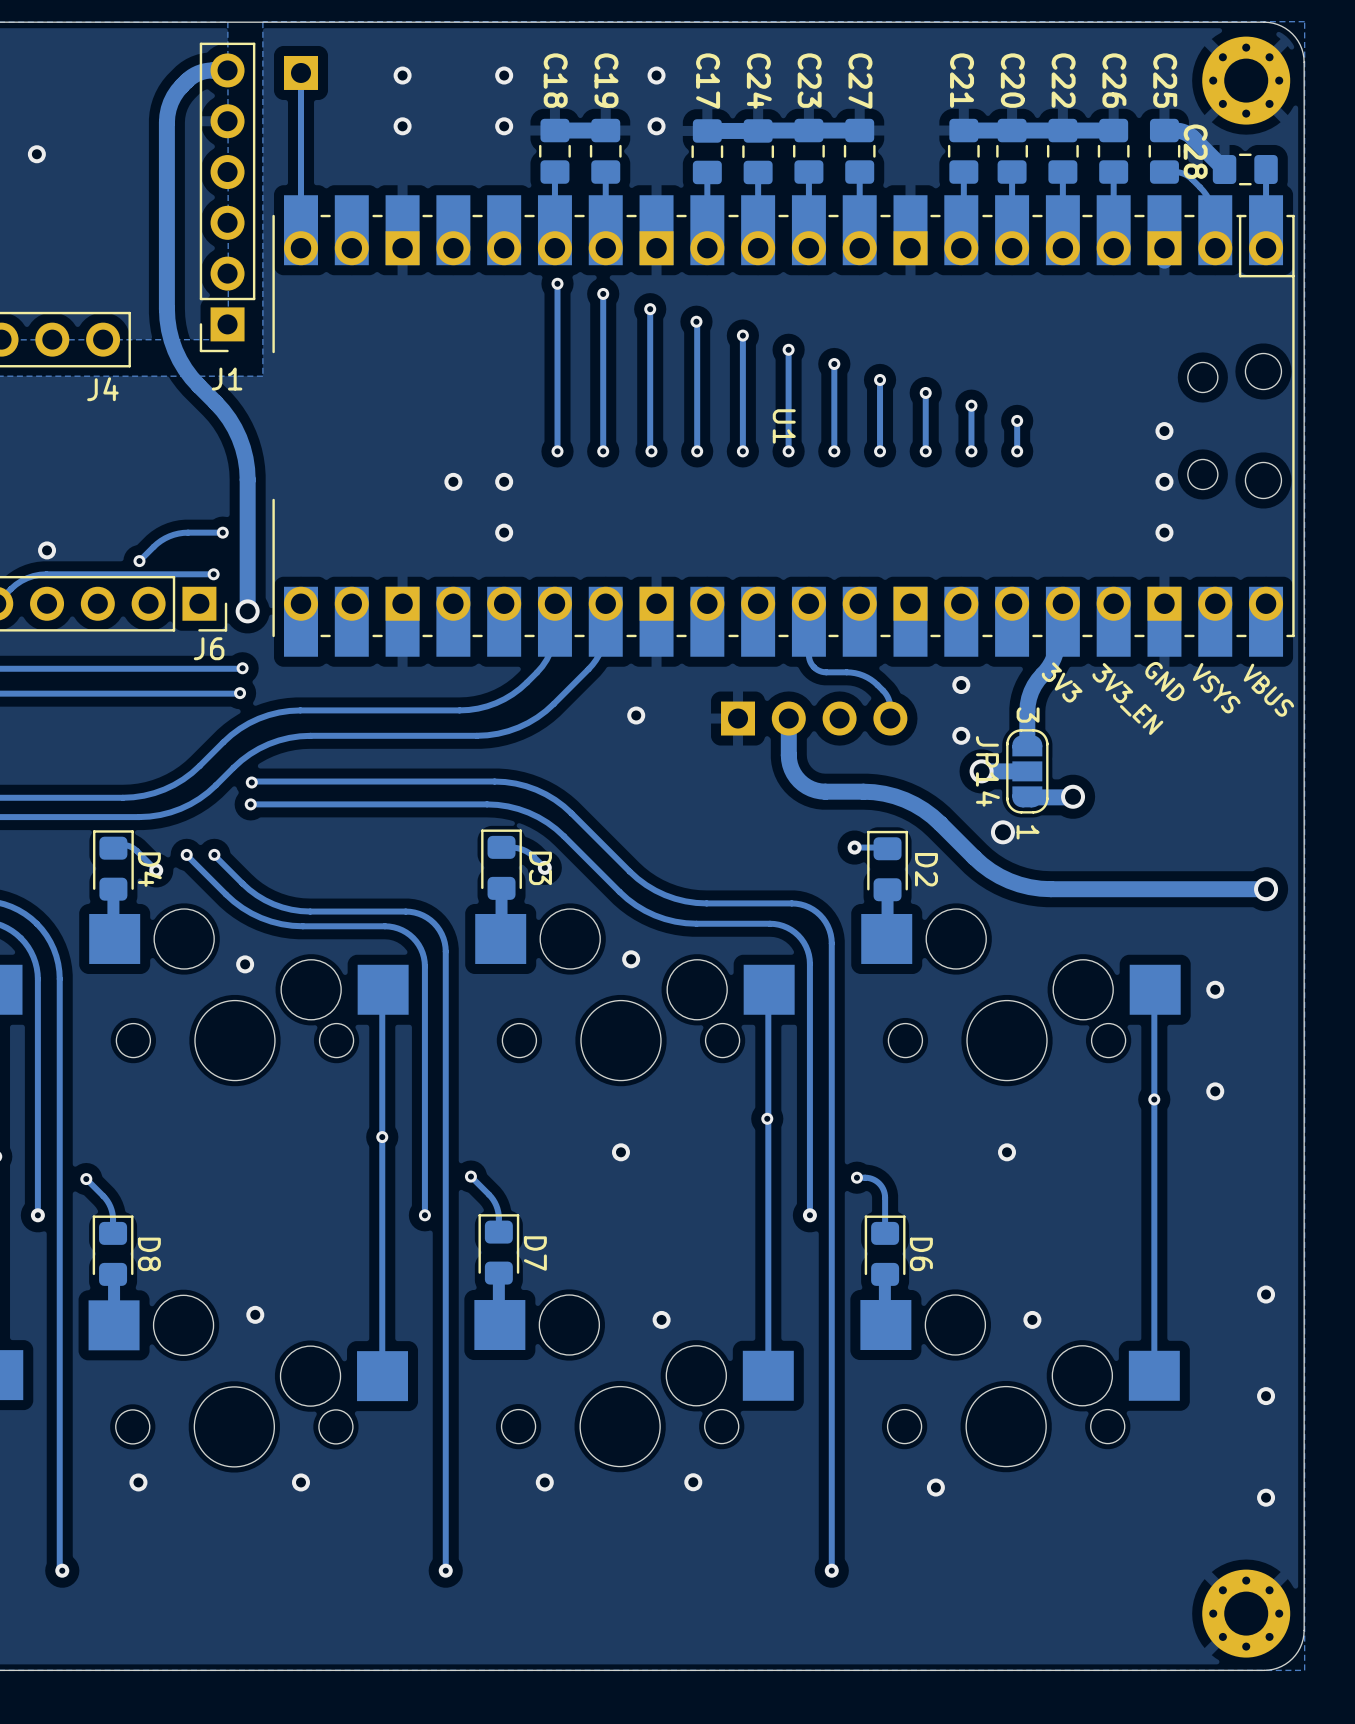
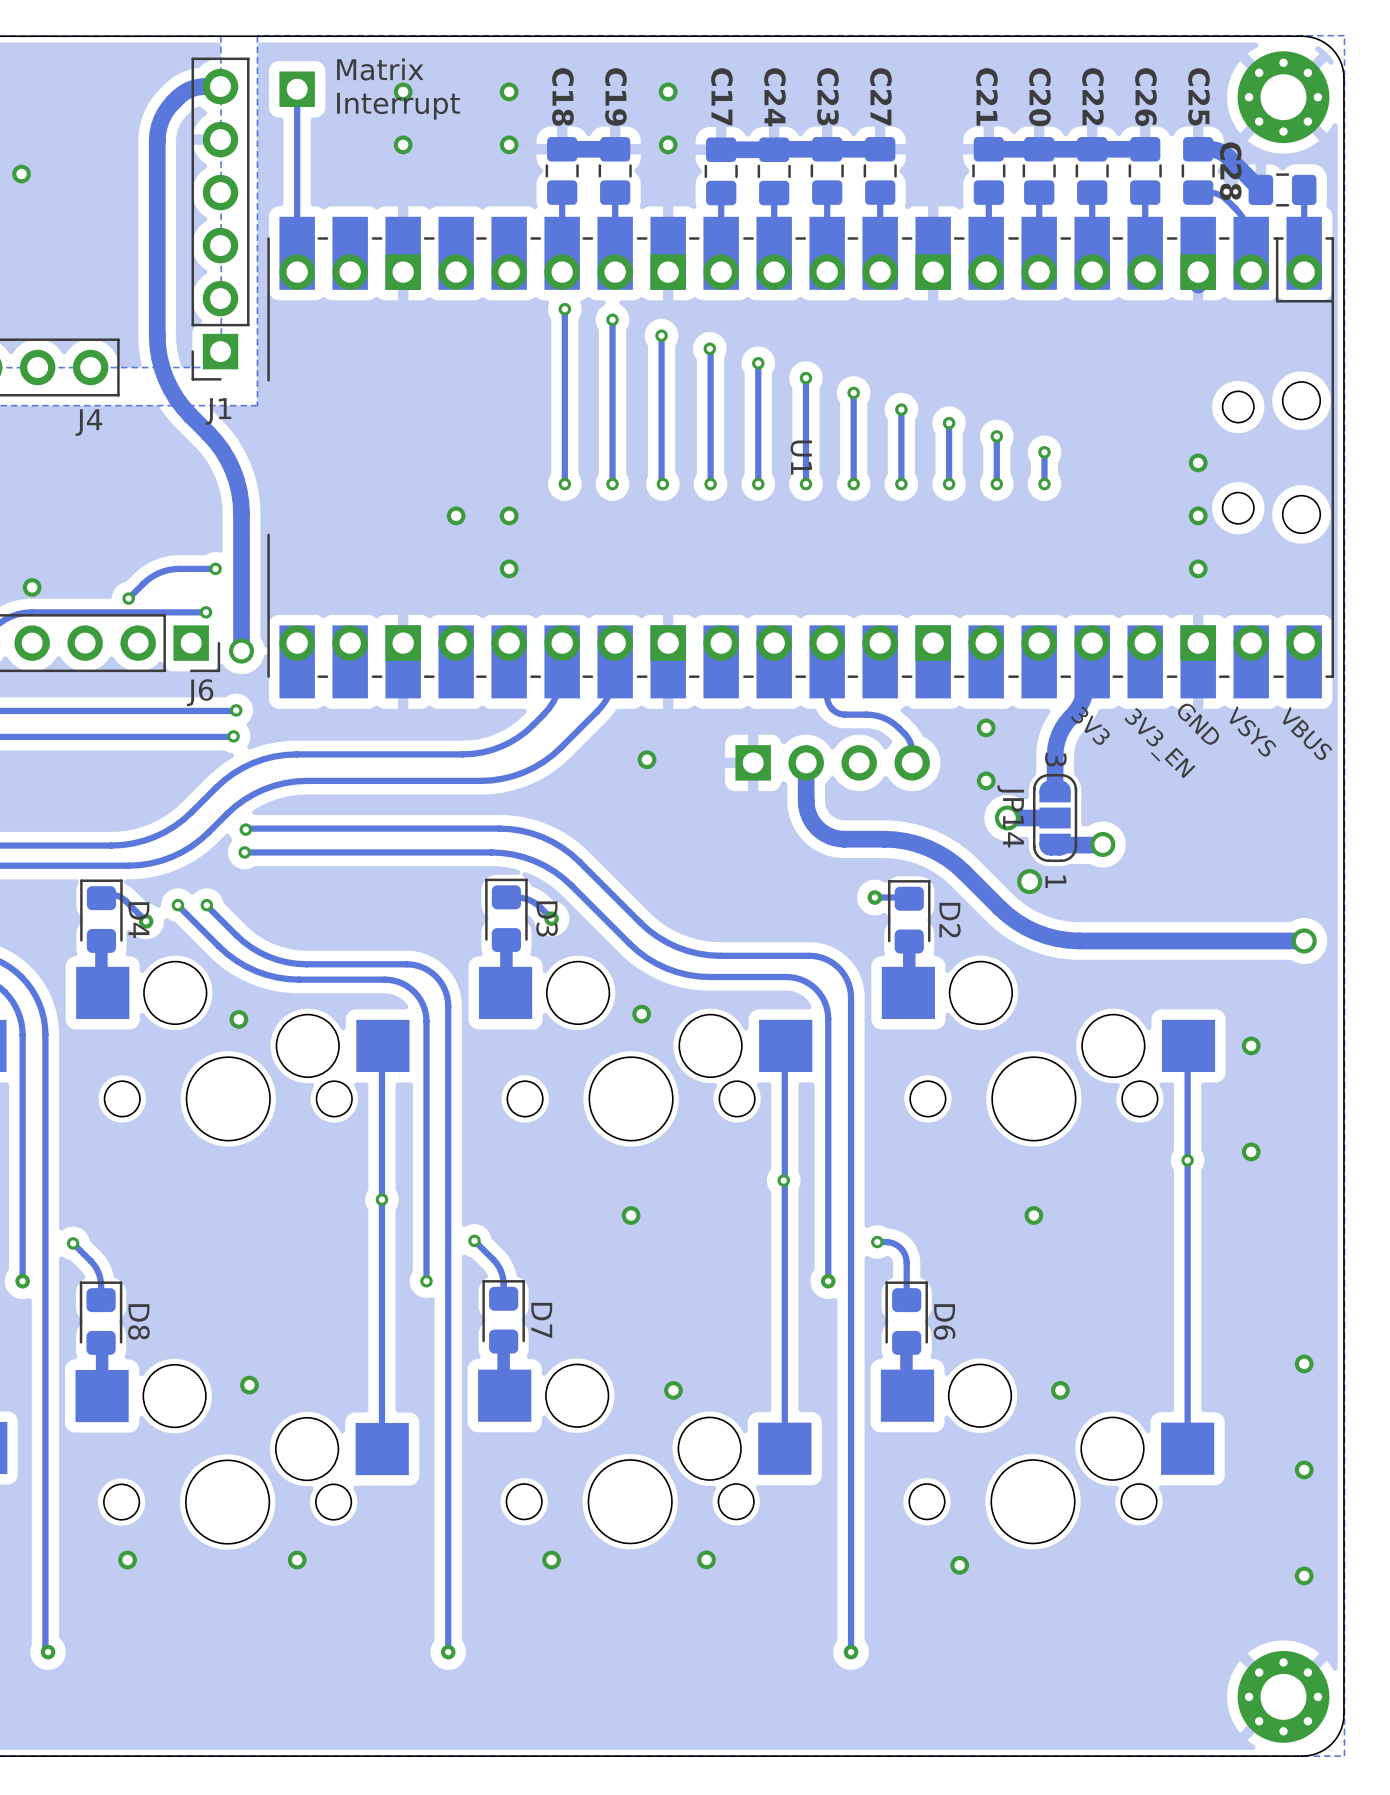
text: none -> Matrix (380, 69)
text: none -> Interrupt (398, 106)

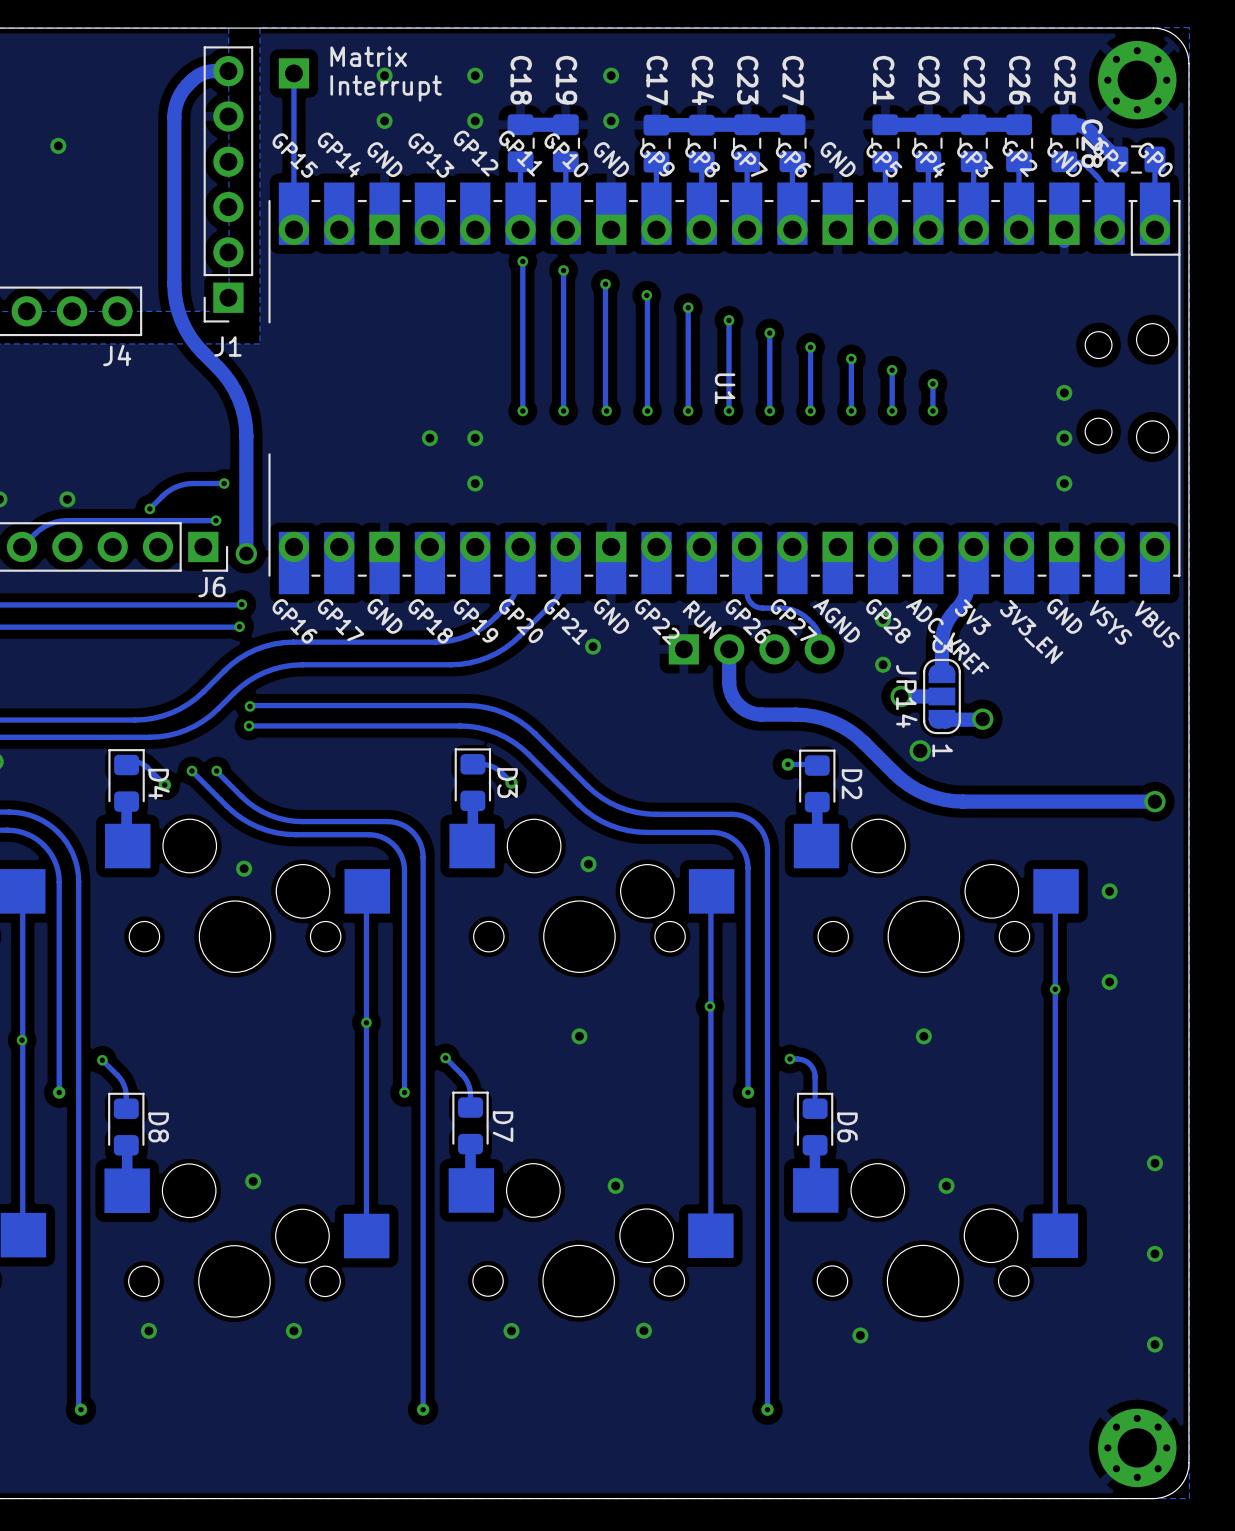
U1 footprint: [267, 216, 1335, 699] -> [268, 182, 1181, 595]

